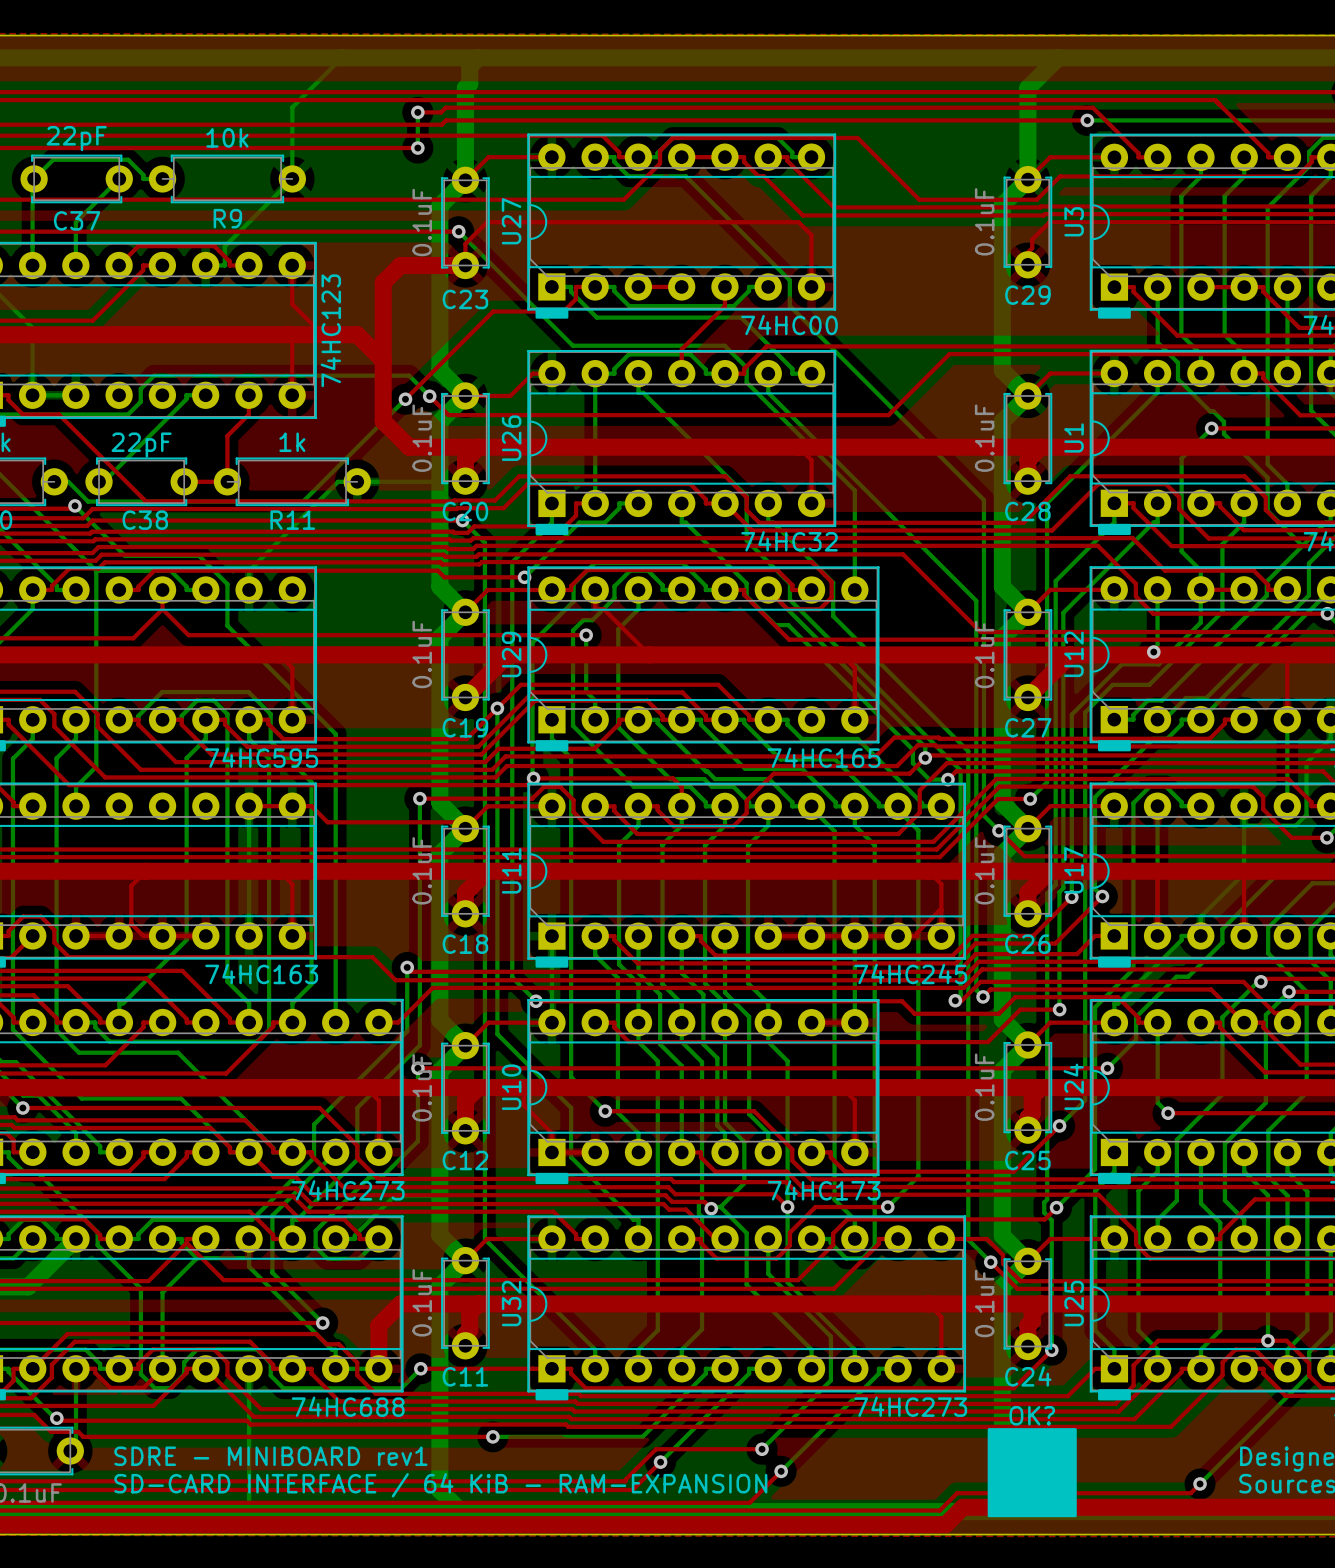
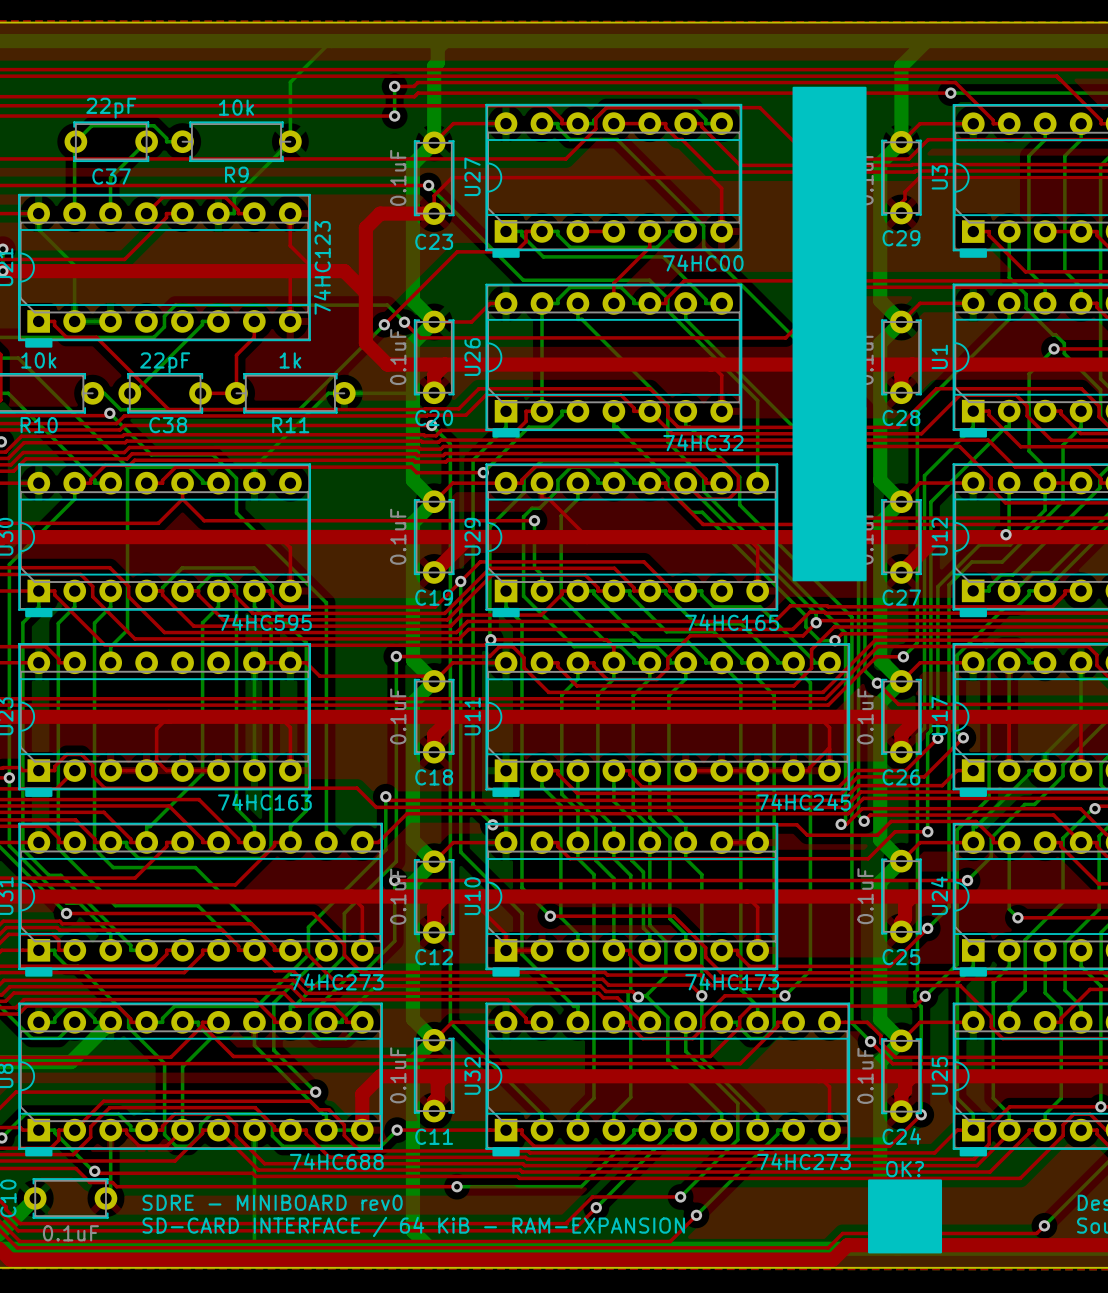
drawing: none -> [792, 86, 867, 582]
text: SDRE - MINIBOARD rev1 (270, 1456) -> SDRE - MINIBOARD rev0 (272, 1202)

